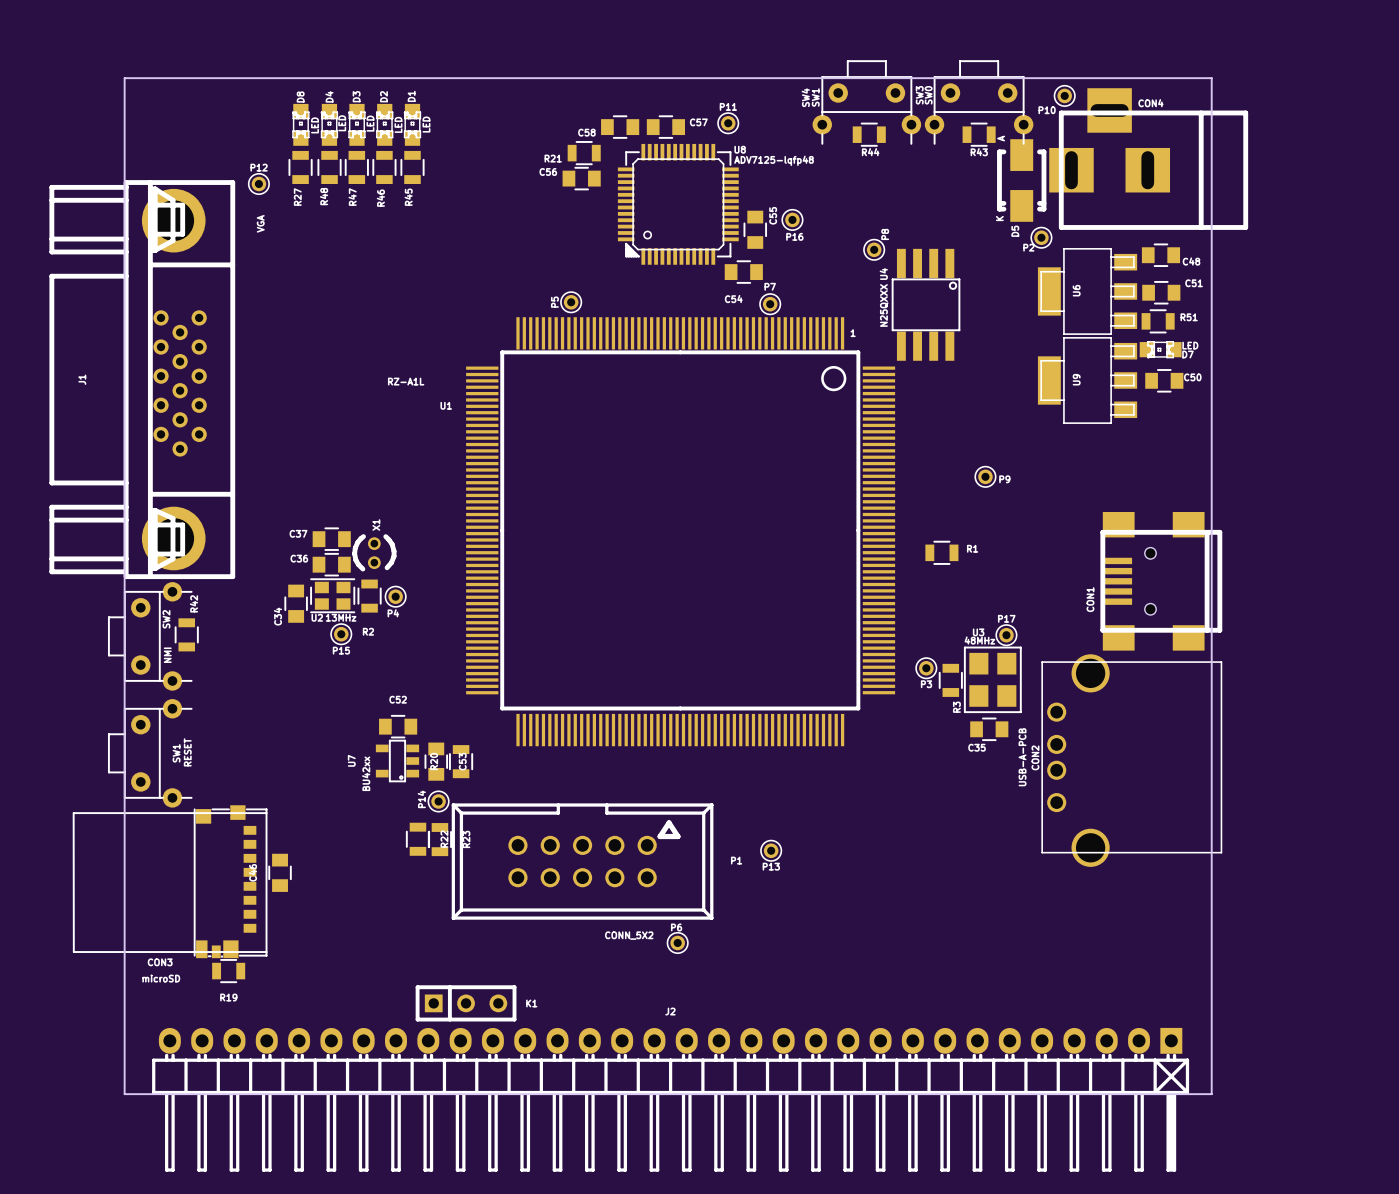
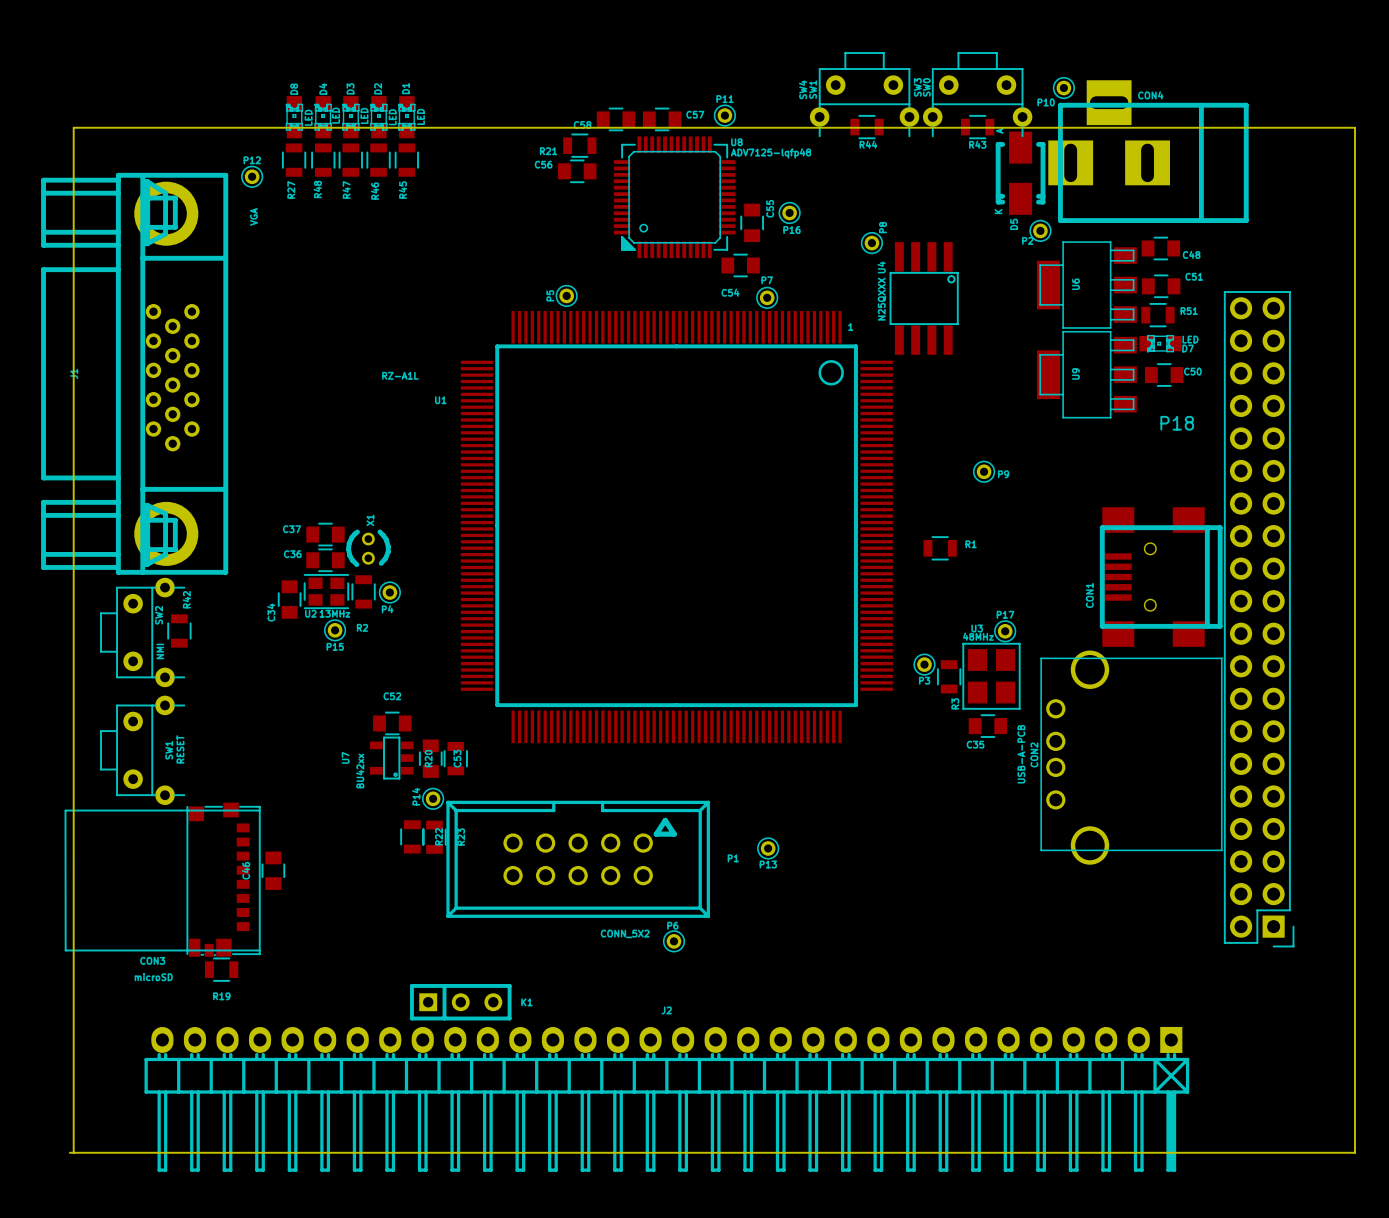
board edge: (124, 78) (124, 1094) (1211, 1094) (1211, 78) (124, 78) -> none
P18: none -> (1259, 619)
board edge: none -> (69, 1152) (1354, 1152) (1354, 127) (73, 127) (73, 1152)

